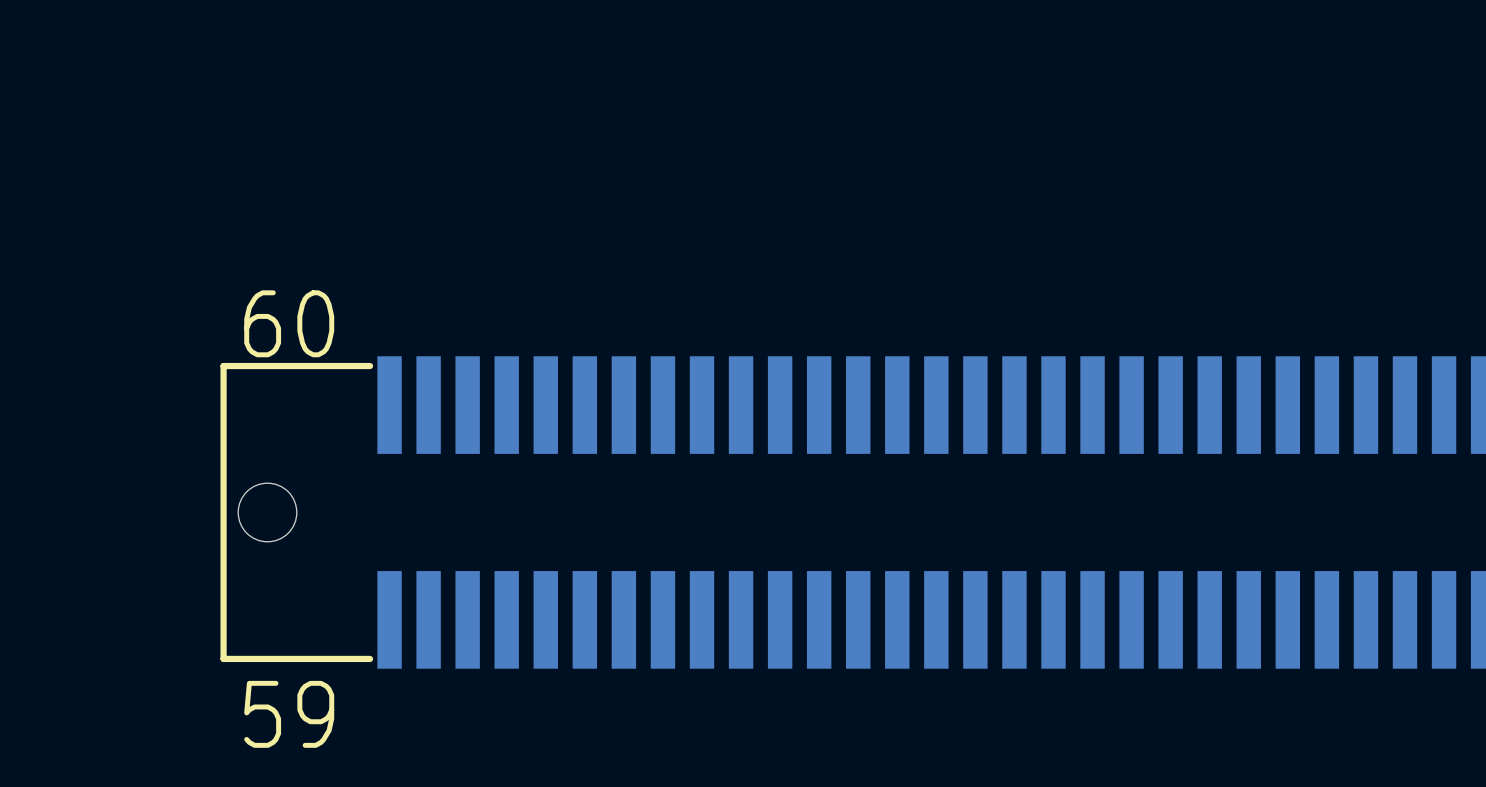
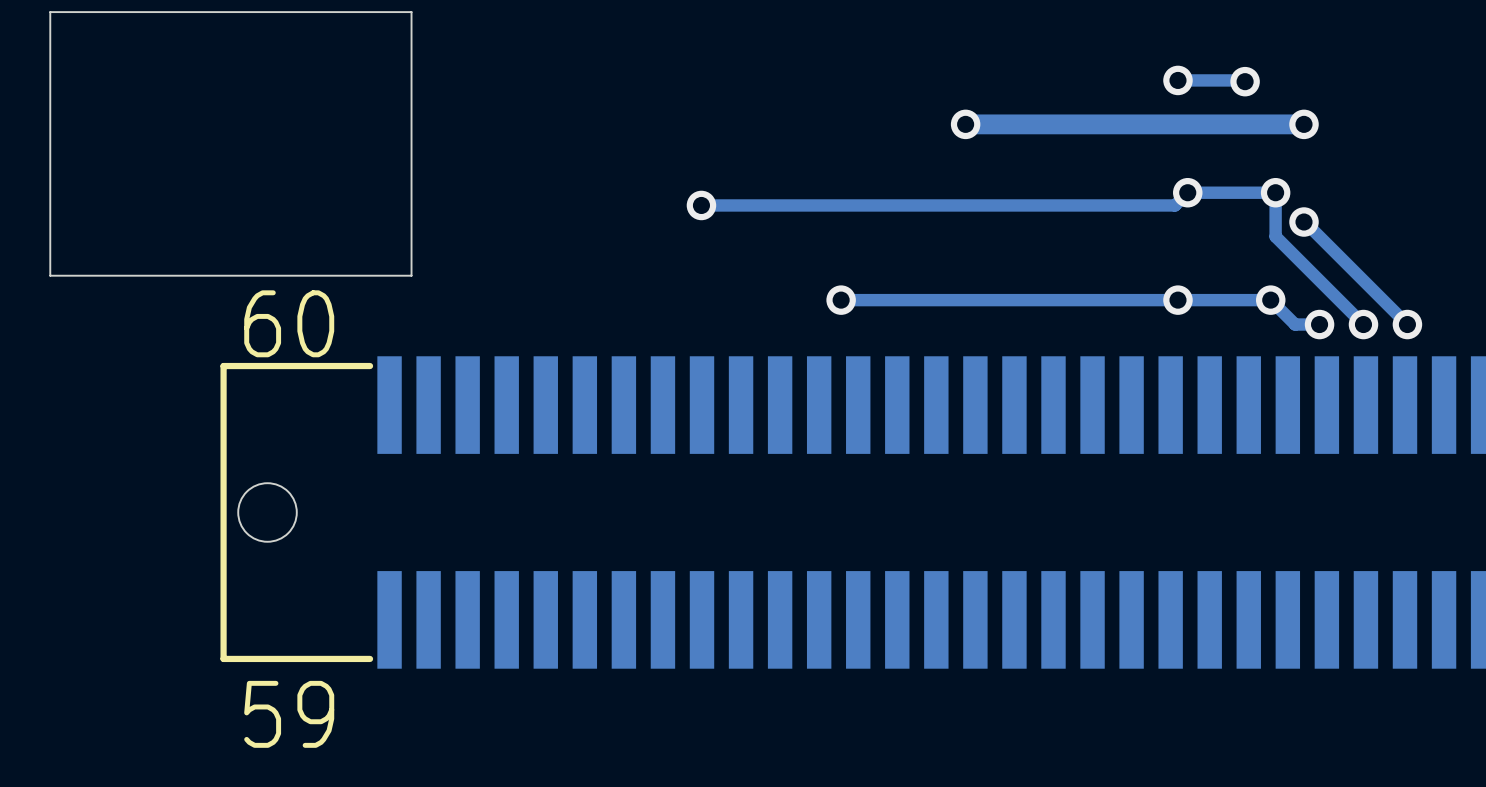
board edge: none -> (411, 12) (411, 275) (50, 275) (50, 12) (411, 12)
track: none -> (1177, 80) (1245, 81)
via: none -> (1177, 80)
via: none -> (1245, 81)
via: none -> (965, 124)
track: none -> (1304, 124) (965, 124)
via: none -> (1304, 124)
via: none -> (1187, 192)
via: none -> (1275, 192)
track: none -> (701, 205) (1175, 205) (1187, 192) (1275, 192) (1275, 236) (1363, 324)
via: none -> (701, 205)
track: none -> (1304, 222) (1407, 324)
via: none -> (1304, 222)
track: none -> (841, 300) (1270, 300) (1295, 324) (1319, 324)
via: none -> (841, 300)
via: none -> (1177, 300)
via: none -> (1270, 300)
via: none -> (1319, 324)
via: none -> (1363, 324)
via: none -> (1407, 324)

